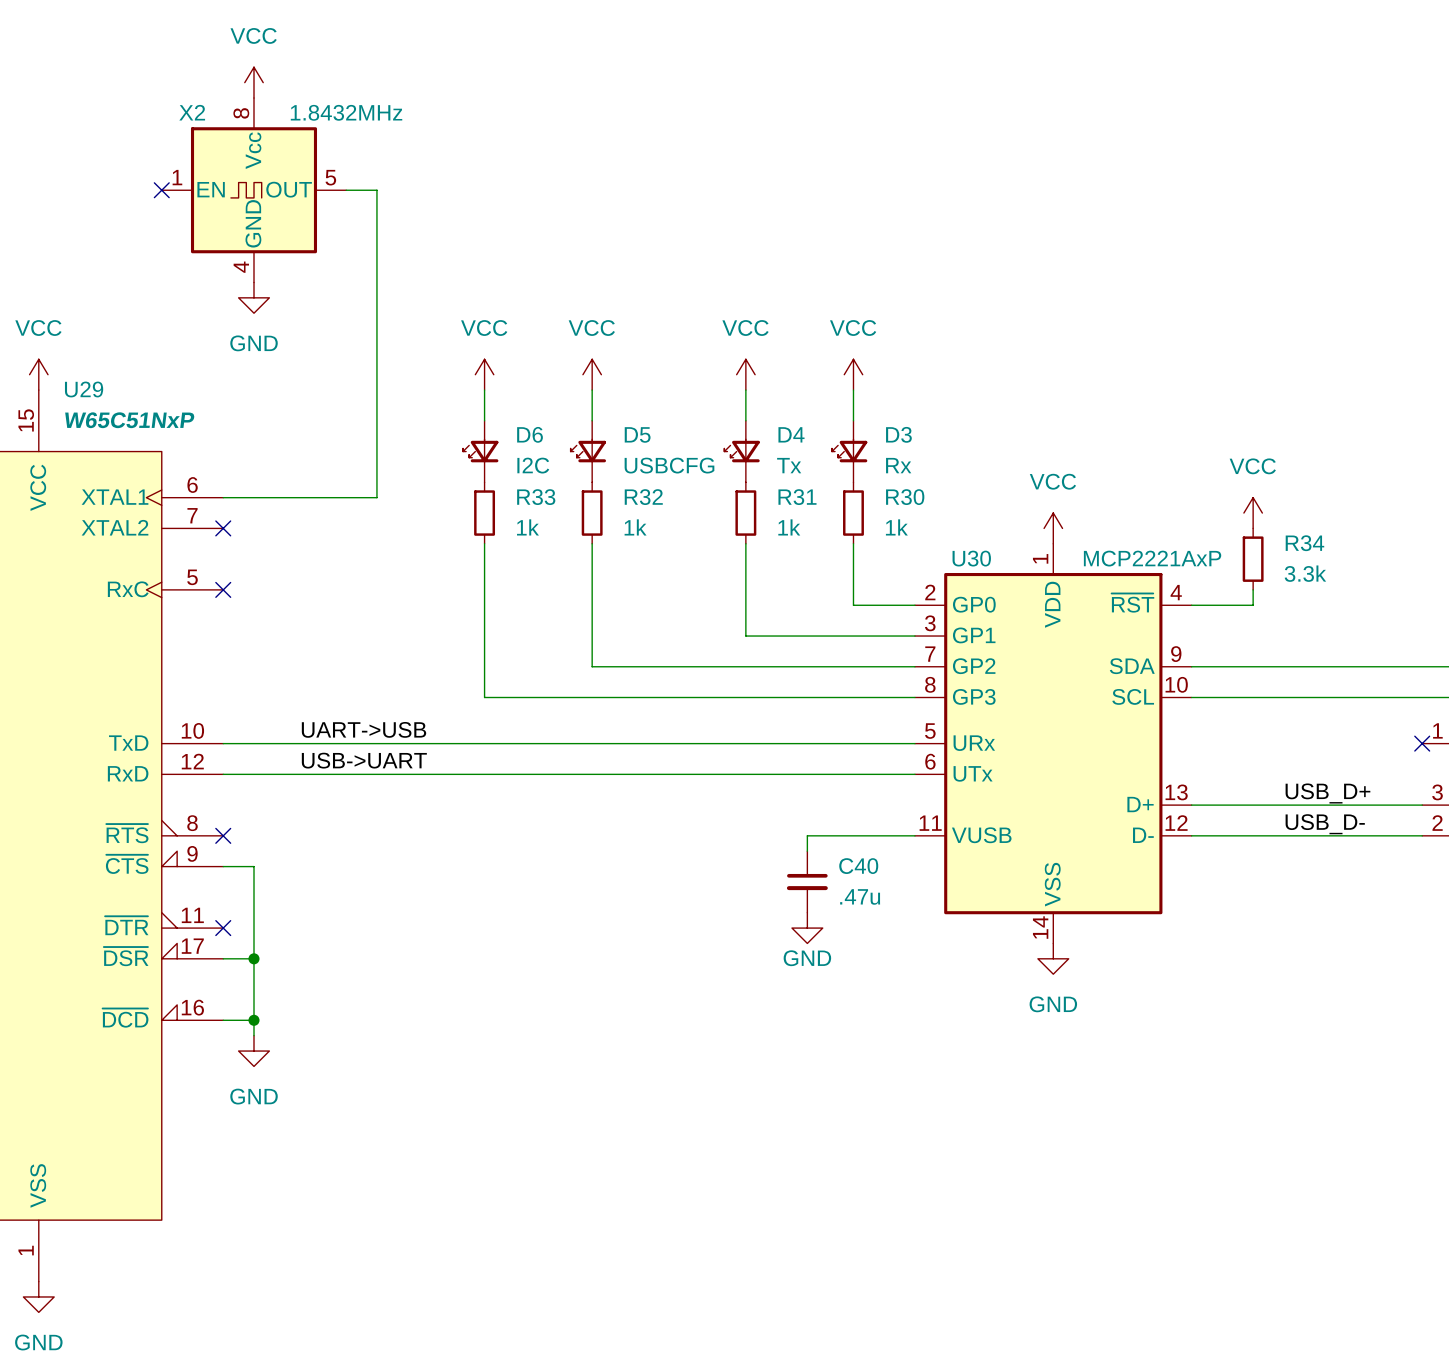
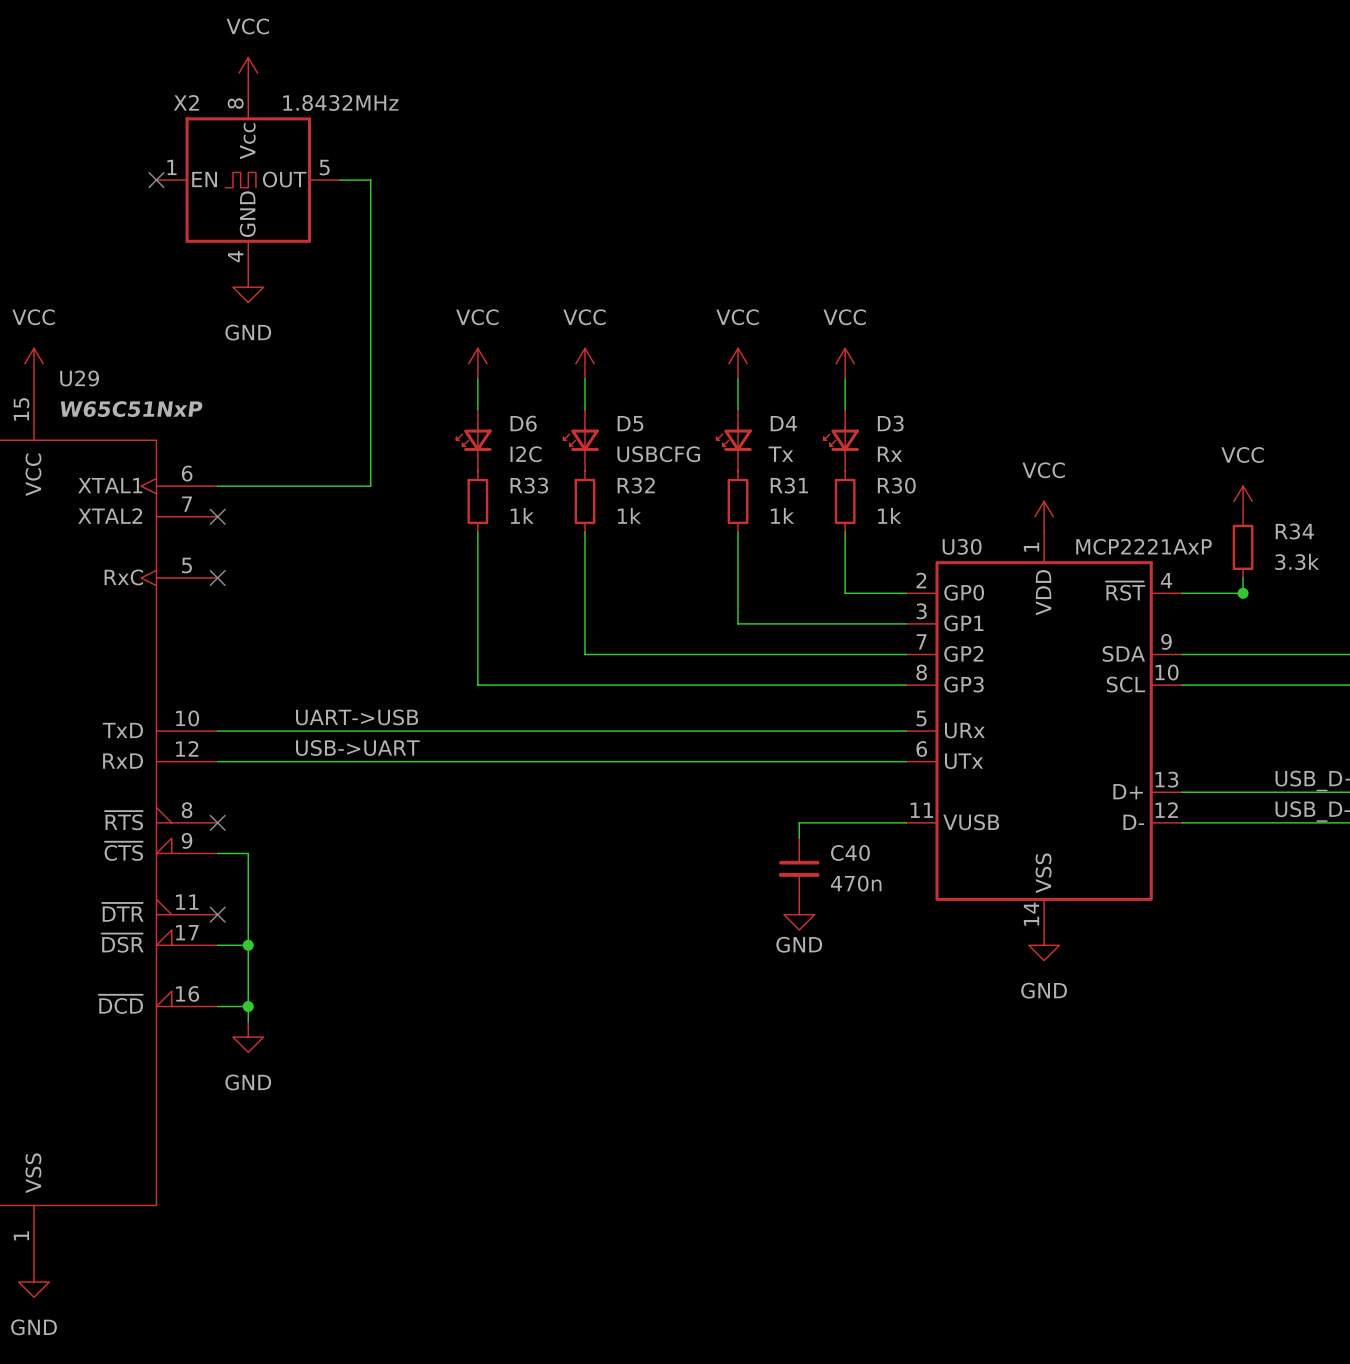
junction: none -> (1243, 593)
C40 value: .47u (860, 896) -> 470n (856, 883)

